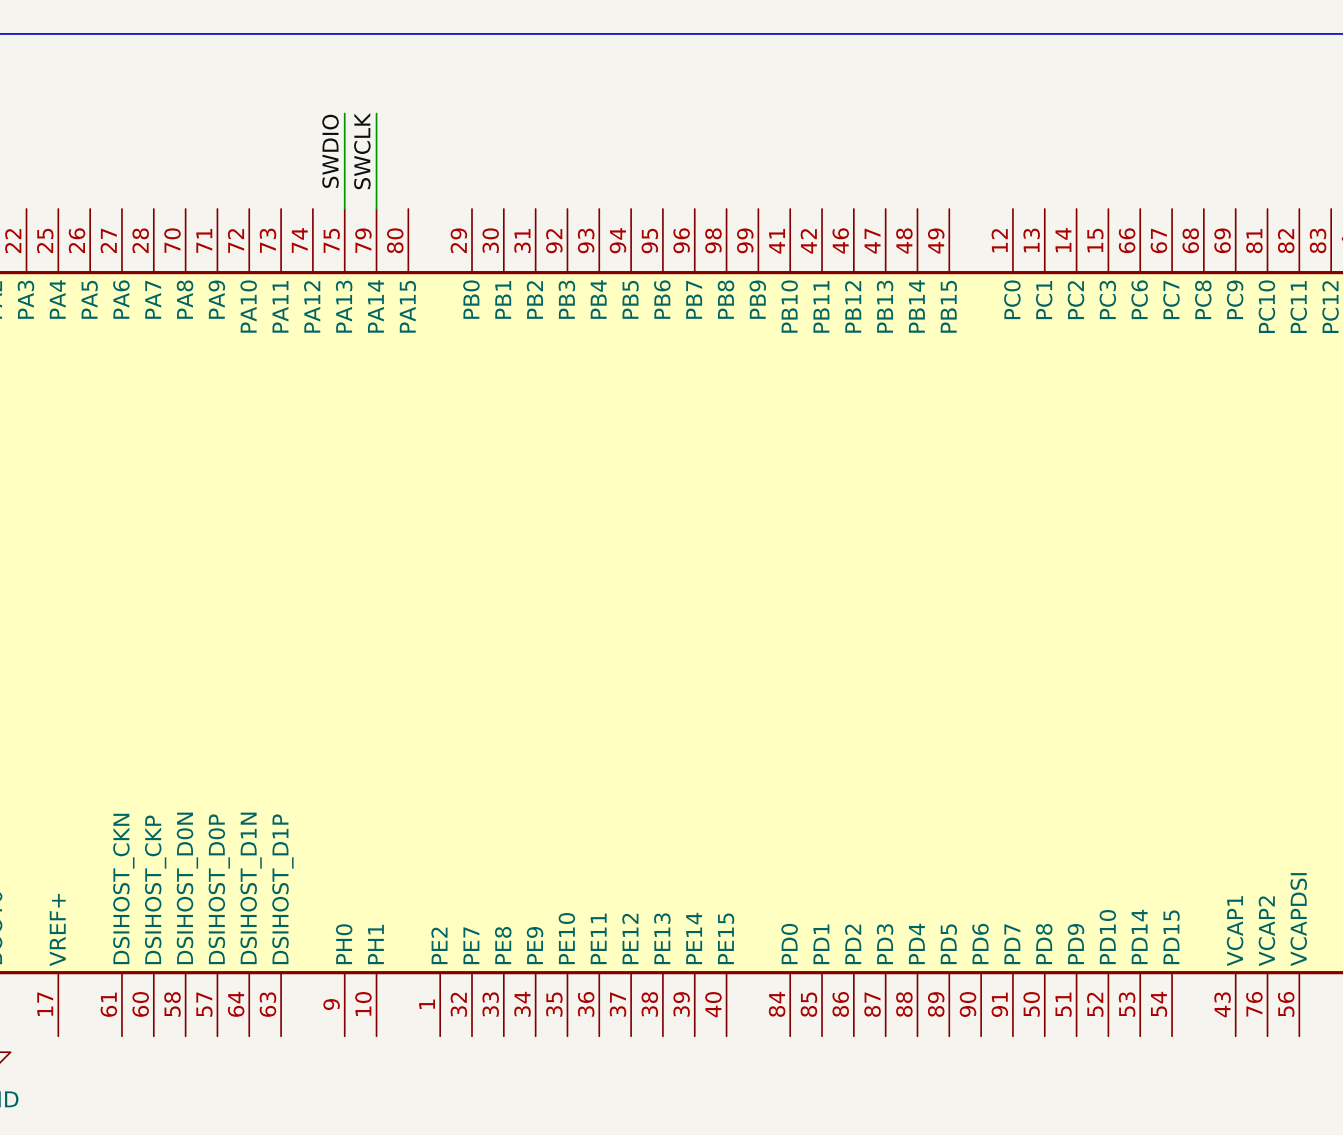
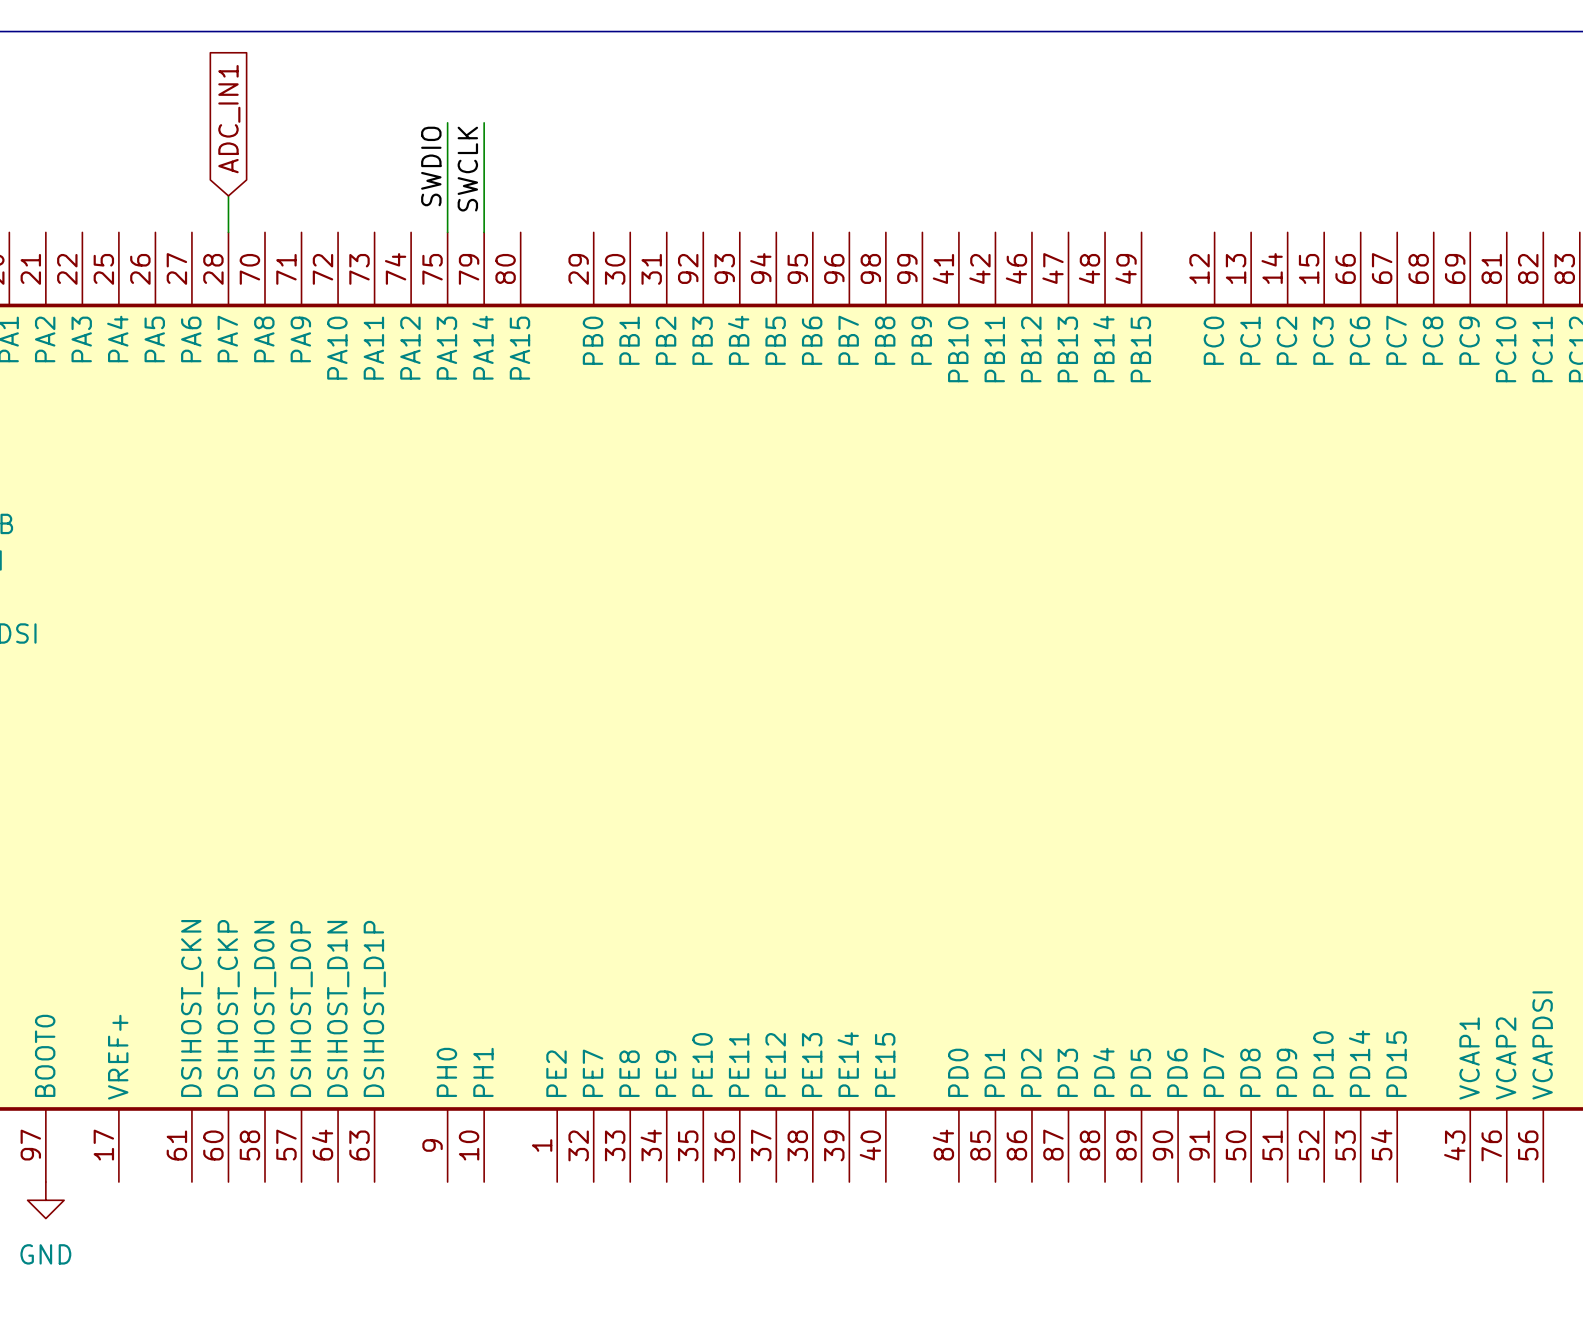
global label: none -> ADC_IN1 (229, 119)
wire: none -> (228, 195) (228, 232)

